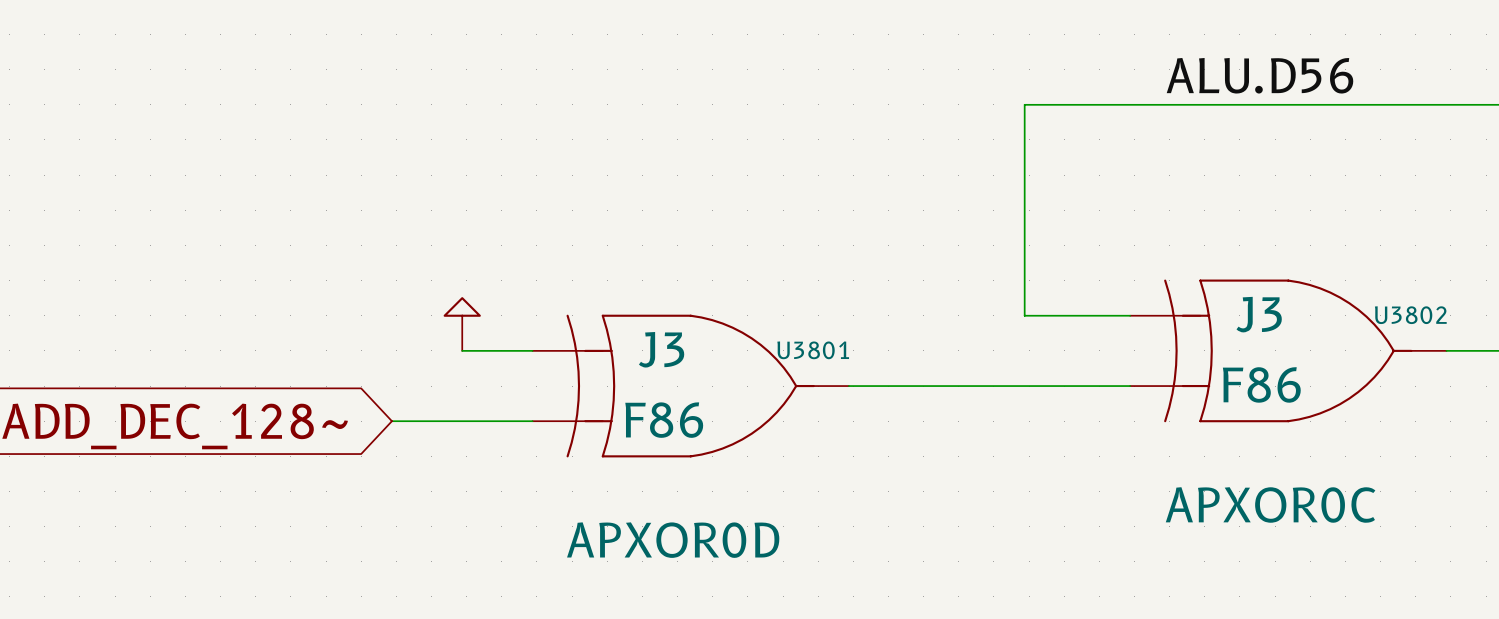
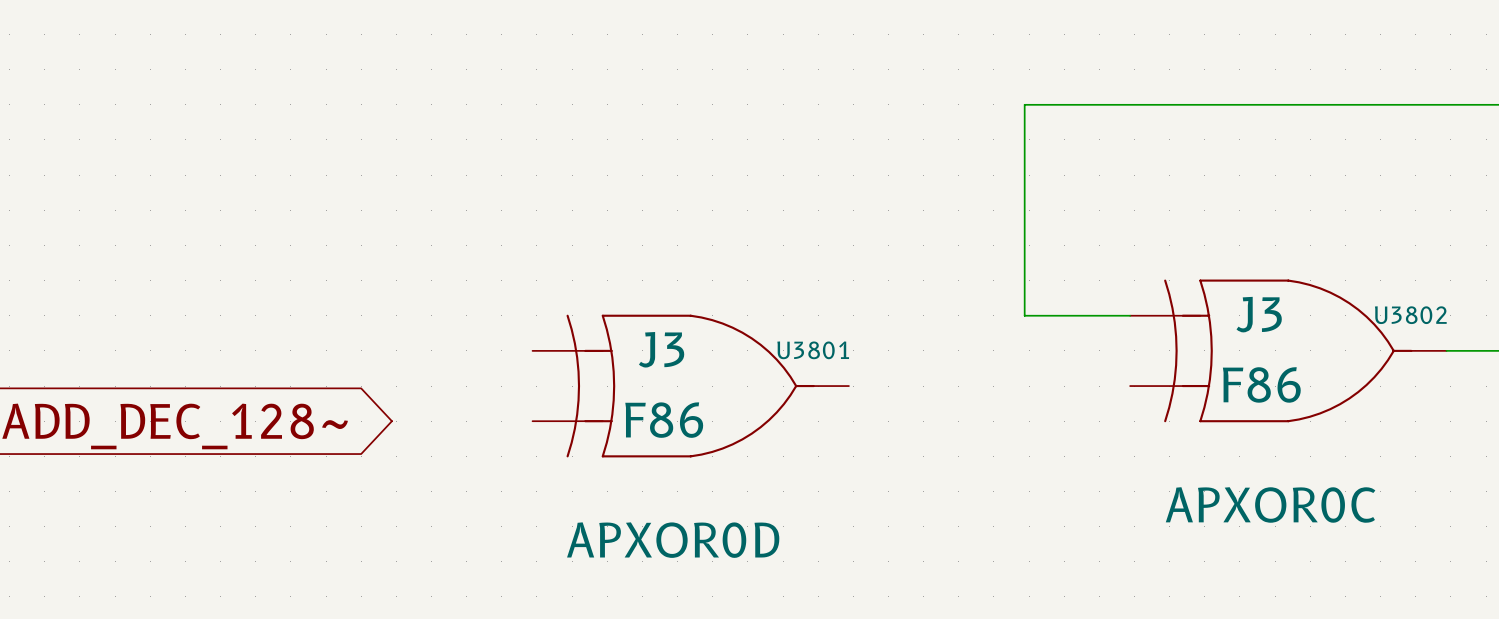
label: ALU.D56 (1259, 75) -> none
power symbol: (462, 324) -> none
wire: (462, 350) (532, 350) -> none
wire: (848, 386) (1130, 386) -> none
wire: (391, 421) (532, 421) -> none

